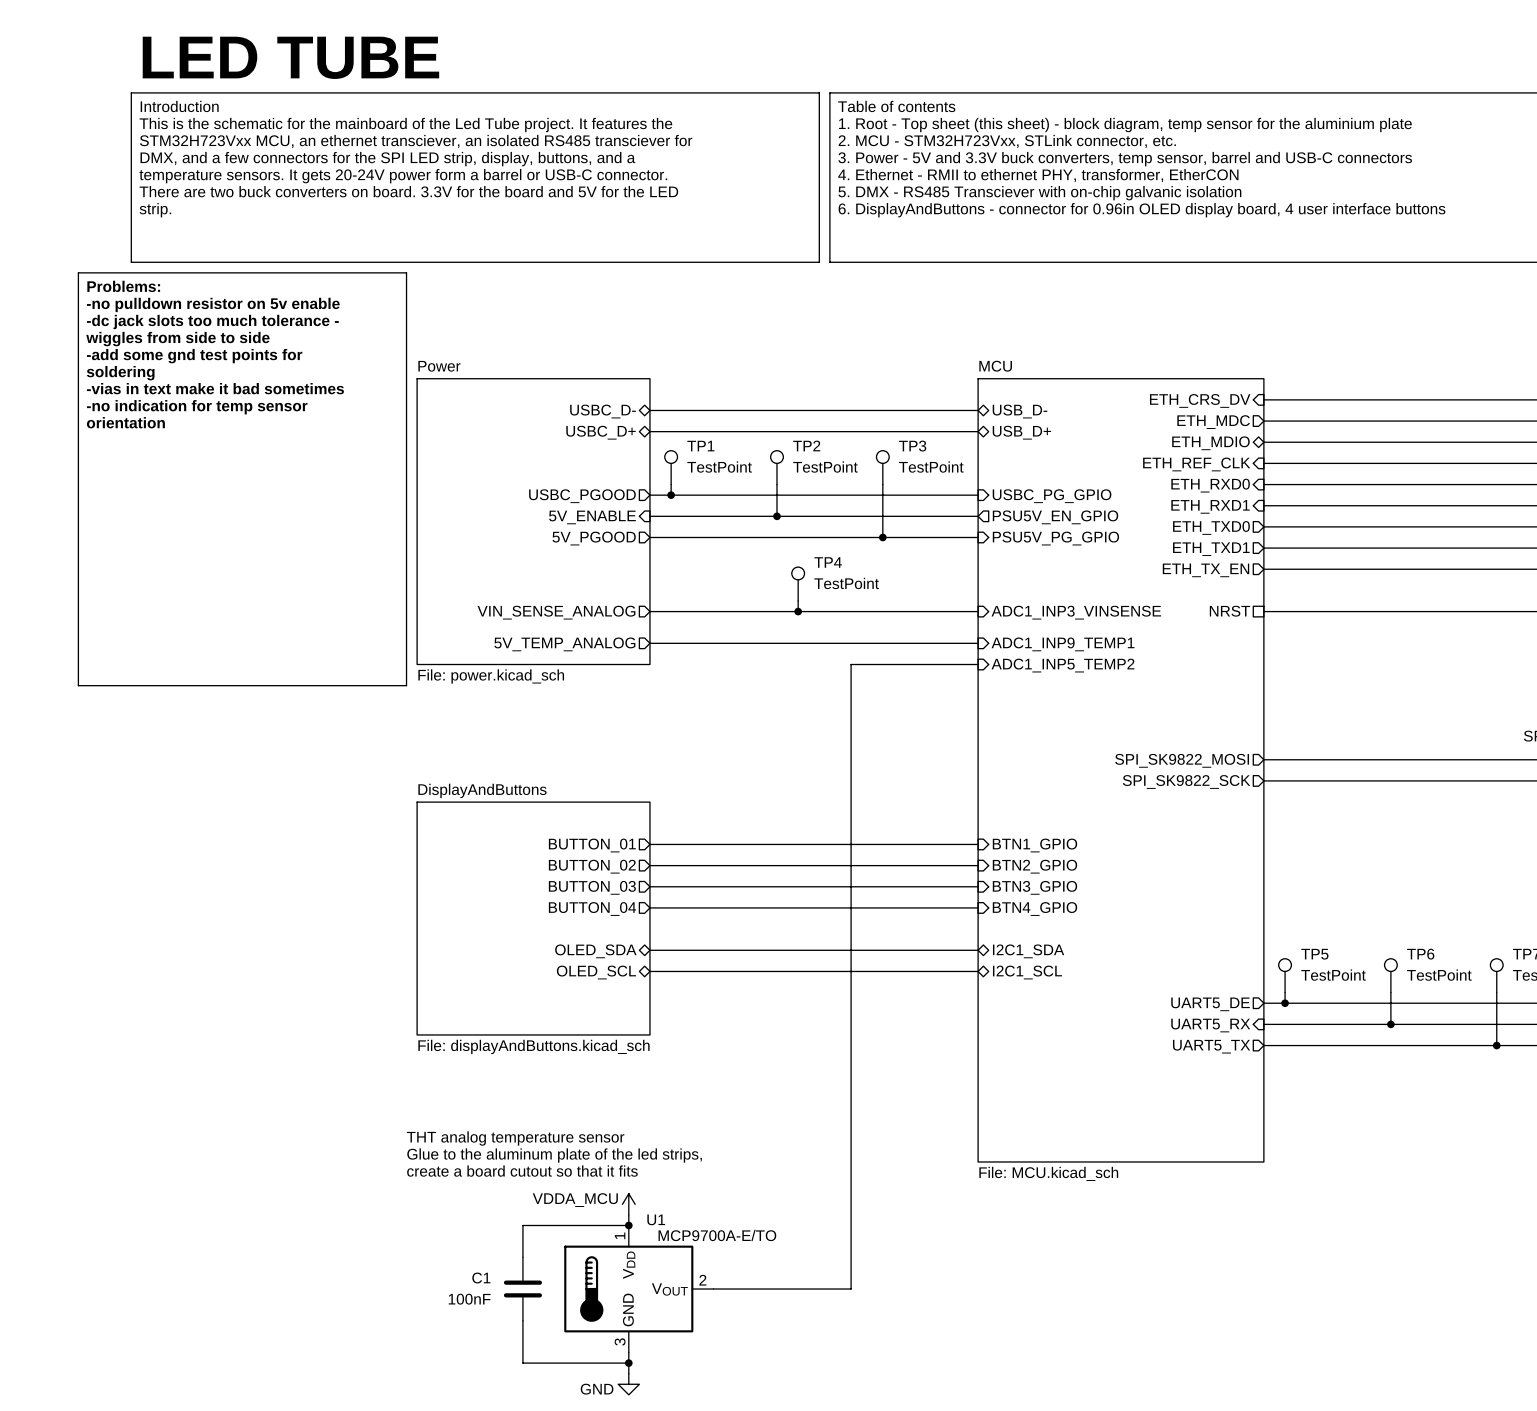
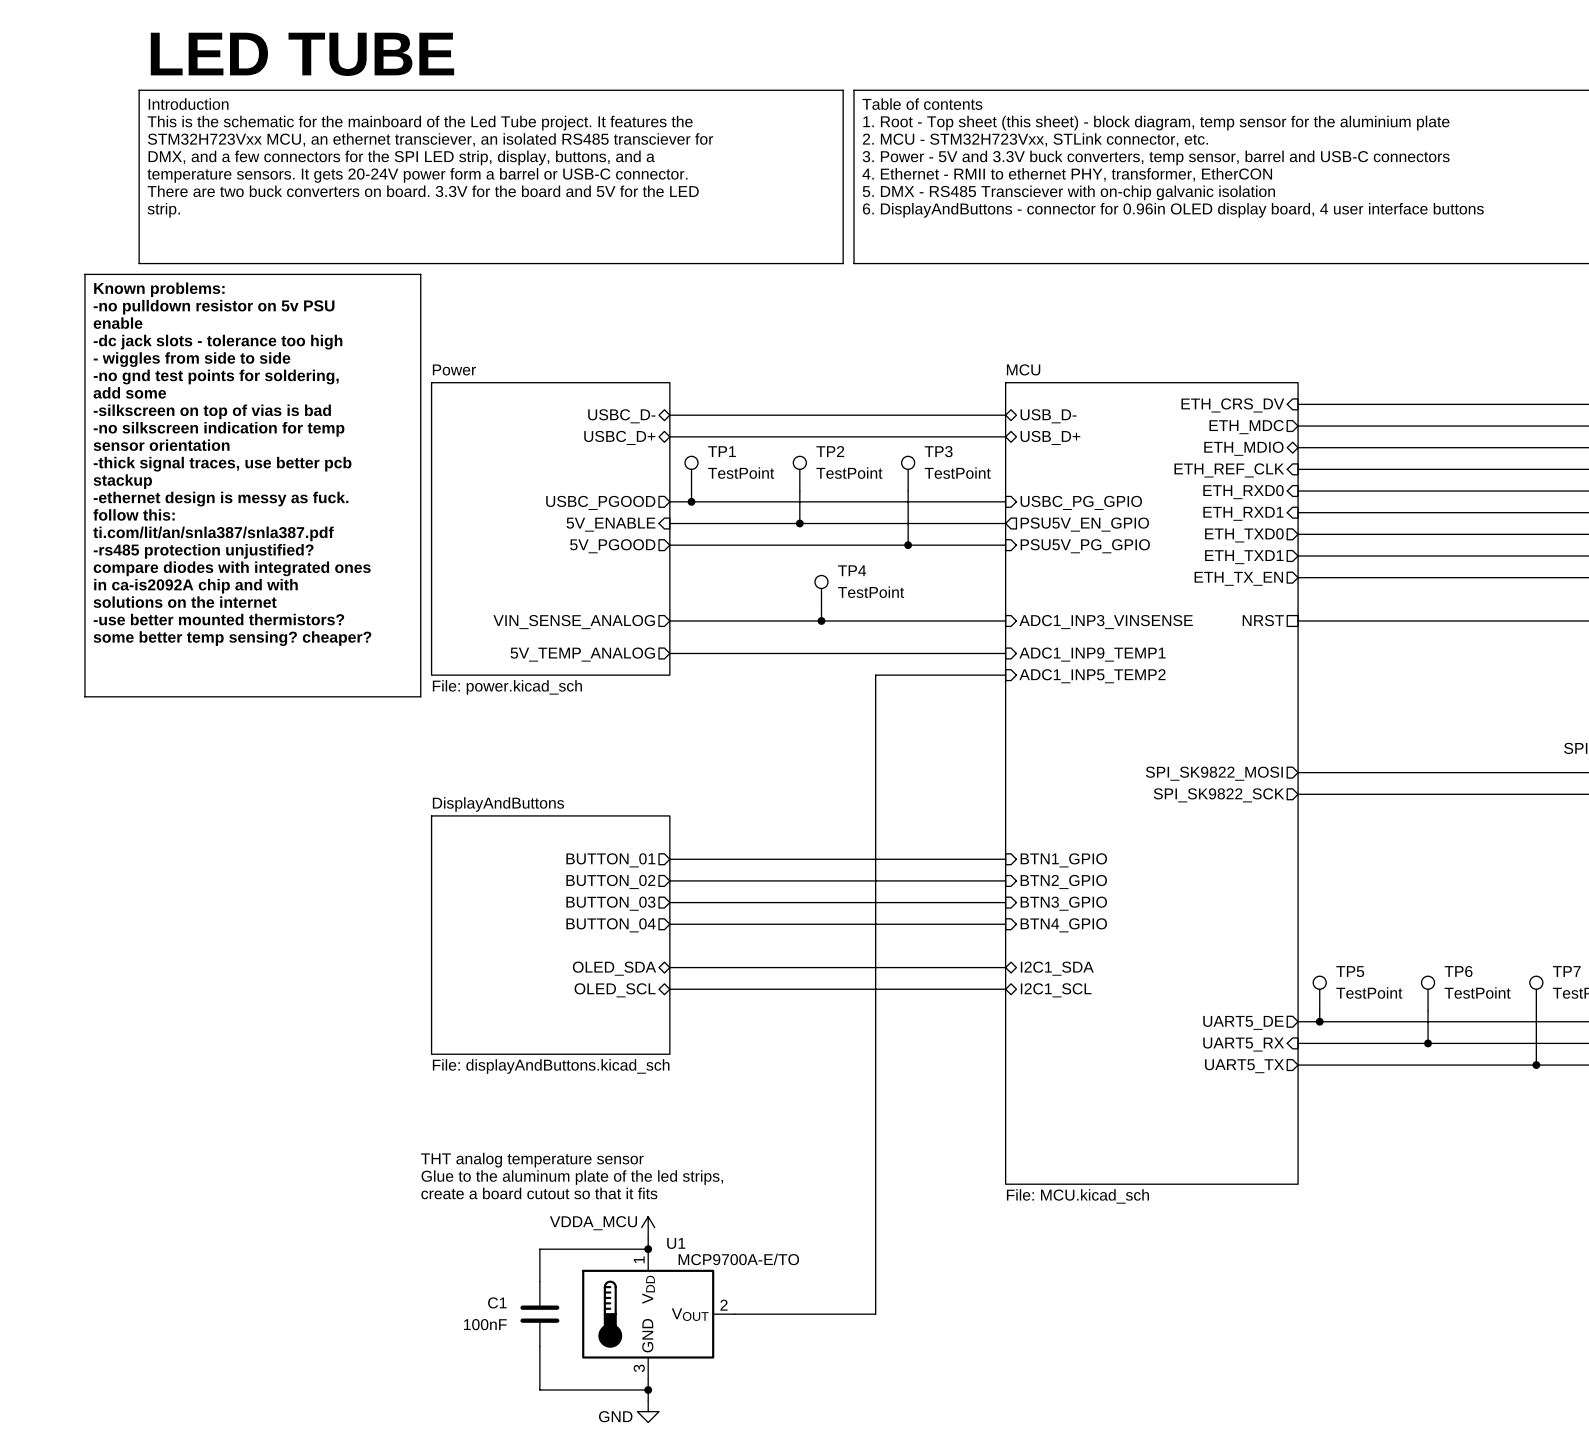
text: Problems: (123, 286) -> Known problems: (159, 289)
text: -no pulldown resistor on 5v enable (213, 304) -> -no pulldown resistor on 5v PSU (214, 307)
text: -dc jack slots too much tolerance - (212, 322) -> enable (118, 323)
text: wiggles from side to side (177, 339) -> -dc jack slots - tolerance too high (218, 342)
text: -add some gnd test points for (194, 356) -> - wiggles from side to side (191, 359)
text: soldering (120, 373) -> -no gnd test points for soldering, (216, 377)
text: -vias in text make it bad sometimes (215, 388) -> add some (129, 392)
text: -no indication for temp sensor (197, 407) -> -silkscreen on top of vias is bad (212, 411)
text: orientation (125, 422) -> -no silkscreen indication for temp (219, 429)
text: none -> sensor orientation (161, 445)
text: none -> -thick signal traces, use better pcb (222, 464)
text: none -> stackup (122, 481)
text: none -> -ethernet design is messy as fuck. (221, 499)
text: none -> follow this: (134, 514)
text: none -> ti.com/lit/an/snla387/snla387.pdf (213, 533)
text: none -> -rs485 protection unjustified? (203, 551)
text: none -> compare diodes with integrated ones (232, 568)
text: none -> in ca-is2092A chip and with (195, 586)
text: none -> solutions on the internet (185, 602)
text: none -> -use better mounted thermistors? (218, 619)
text: none -> some better temp sensing? cheaper? (232, 638)

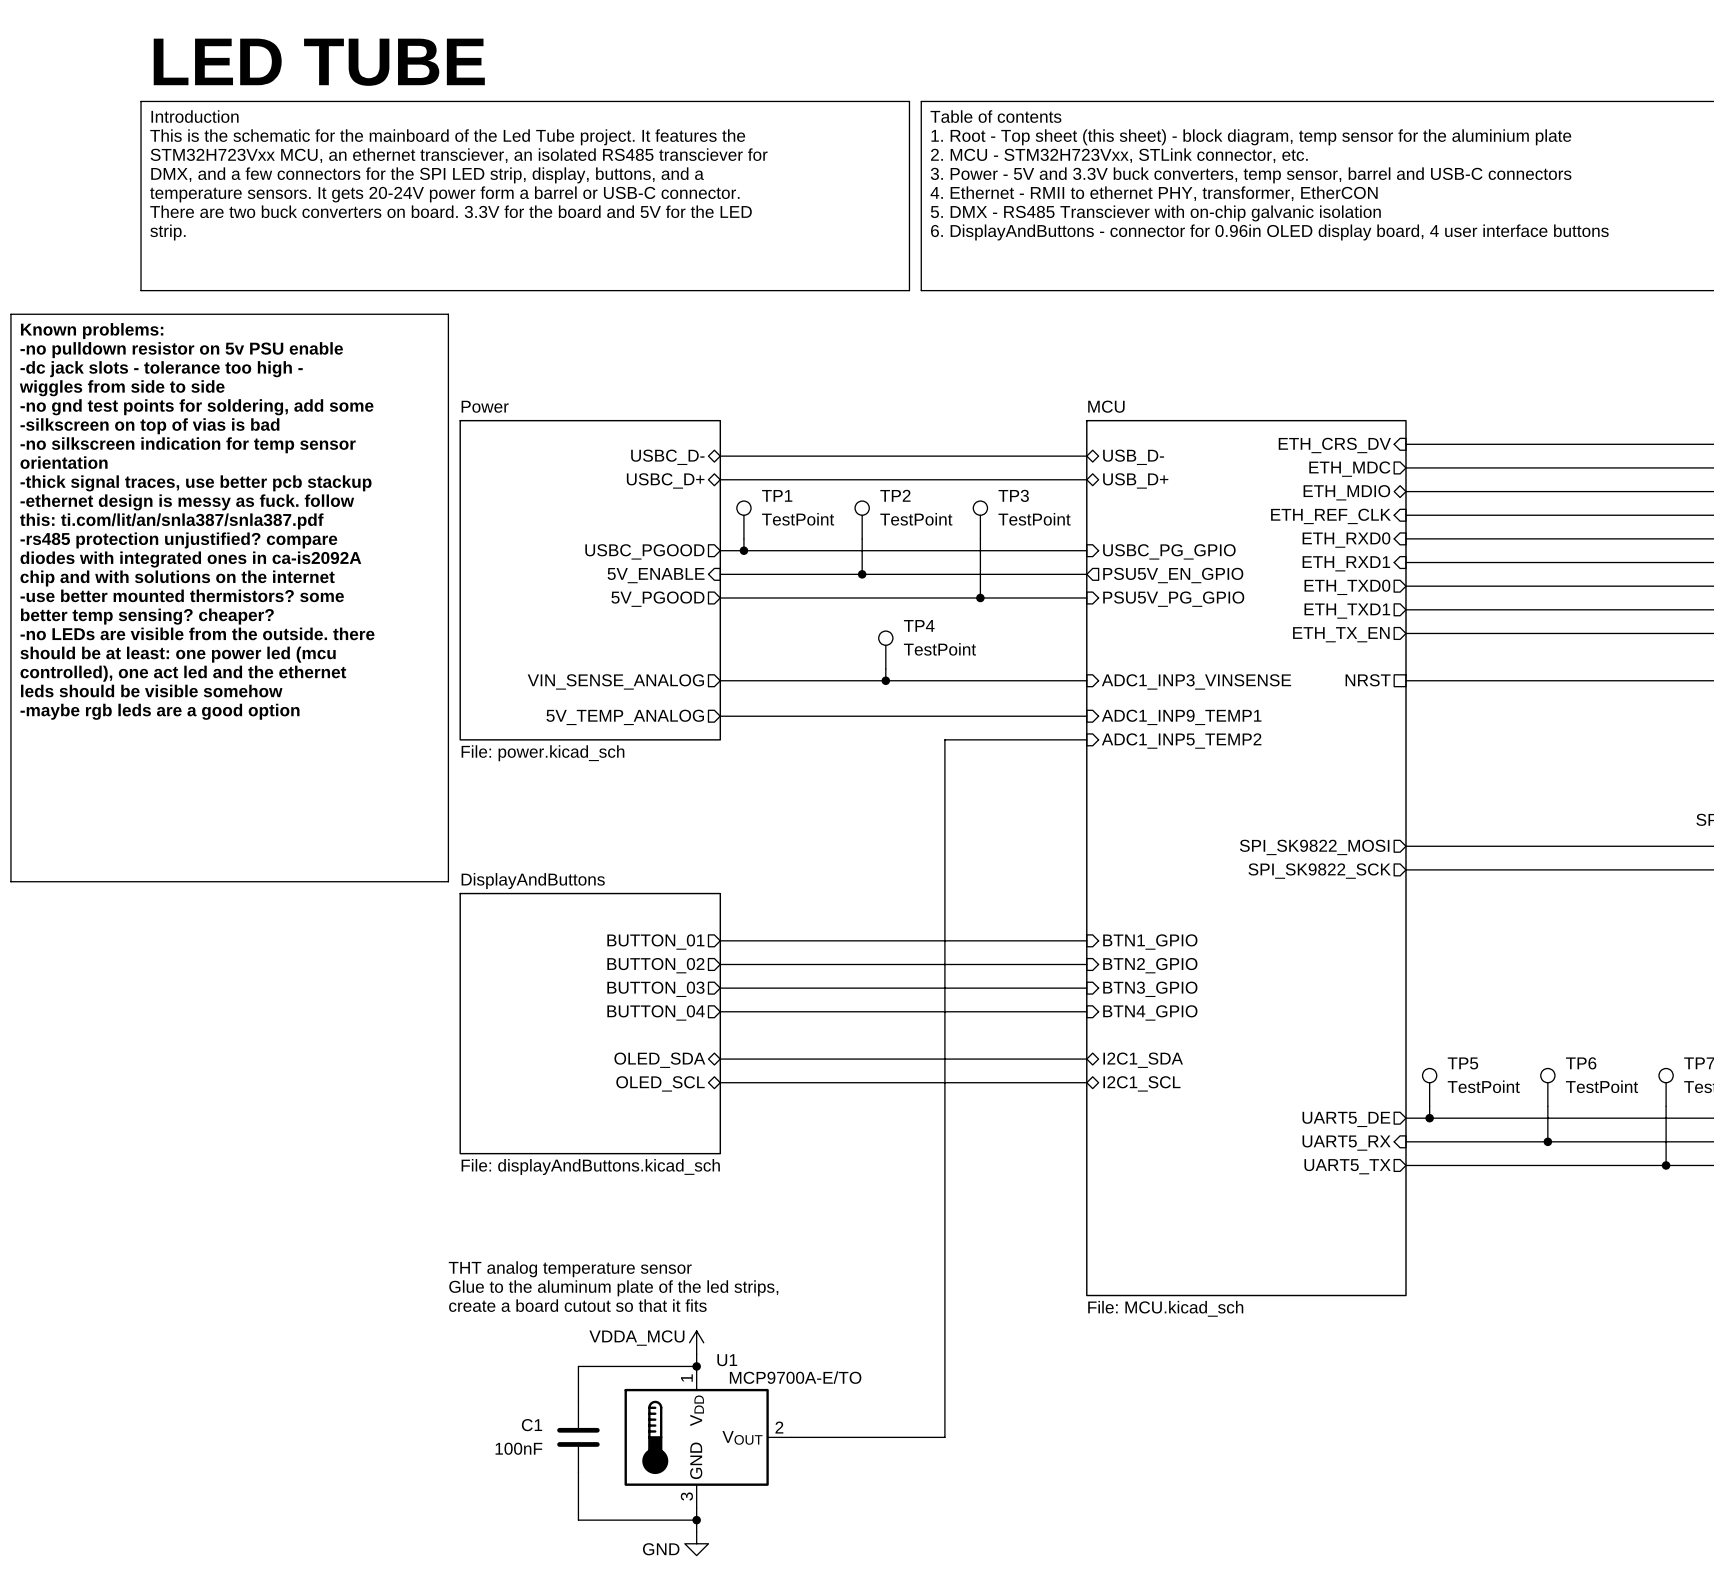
line: (420, 285) (420, 274) (84, 274) (84, 696) (420, 696) -> (448, 314) (10, 314) (10, 881) (448, 881) (448, 763)
text position: Known problems: (159, 289) -> Known problems: (92, 331)
text: -no pulldown resistor on 5v PSU (214, 307) -> -no pulldown resistor on 5v PSU enable (181, 350)
text: enable (118, 323) -> none
text: -dc jack slots - tolerance too high (218, 342) -> -dc jack slots - tolerance too high - (161, 369)
text: - wiggles from side to side (191, 359) -> wiggles from side to side (122, 388)
text: -no gnd test points for soldering, (216, 377) -> -no gnd test points for soldering, add some (196, 407)
text: add some (129, 392) -> none
text: none -> -no silkscreen indication for temp sensor (188, 445)
text position: -silkscreen on top of vias is bad (212, 411) -> -silkscreen on top of vias is bad (149, 426)
text: none -> orientation (64, 462)
text: -no silkscreen indication for temp (219, 429) -> none
text: none -> -thick signal traces, use better pcb stackup (196, 483)
text: sensor orientation (161, 445) -> none
text: none -> -ethernet design is messy as fuck. follow (187, 502)
text: -thick signal traces, use better pcb (222, 464) -> none
text: none -> this: ti.com/lit/an/snla387/snla387.pdf (171, 521)
text: stackup (122, 481) -> none
text: none -> -rs485 protection unjustified? compare (178, 540)
text: -ethernet design is messy as fuck. (221, 499) -> none
text: none -> diodes with integrated ones in ca-is2092A (190, 559)
text: follow this: (134, 514) -> none
text: none -> chip and with solutions on the internet (177, 578)
text: ti.com/lit/an/snla387/snla387.pdf (213, 533) -> none
text: none -> -use better mounted thermistors? some (182, 595)
text: -rs485 protection unjustified? (203, 551) -> none
text: none -> better temp sensing? cheaper? (147, 616)
text: compare diodes with integrated ones (232, 568) -> none
text: none -> -no LEDs are visible from the outside. there (197, 633)
text: in ca-is2092A chip and with (195, 586) -> none
text: none -> should be at least: one power led (mcu (178, 654)
text: solutions on the internet (185, 602) -> none
text: none -> controlled), one act led and the ethernet (183, 673)
text: -use better mounted thermistors? (218, 619) -> none
text: none -> leds should be visible somehow (151, 691)
text: some better temp sensing? cheaper? (232, 638) -> none
text: none -> -maybe rgb leds are a good option (159, 711)

